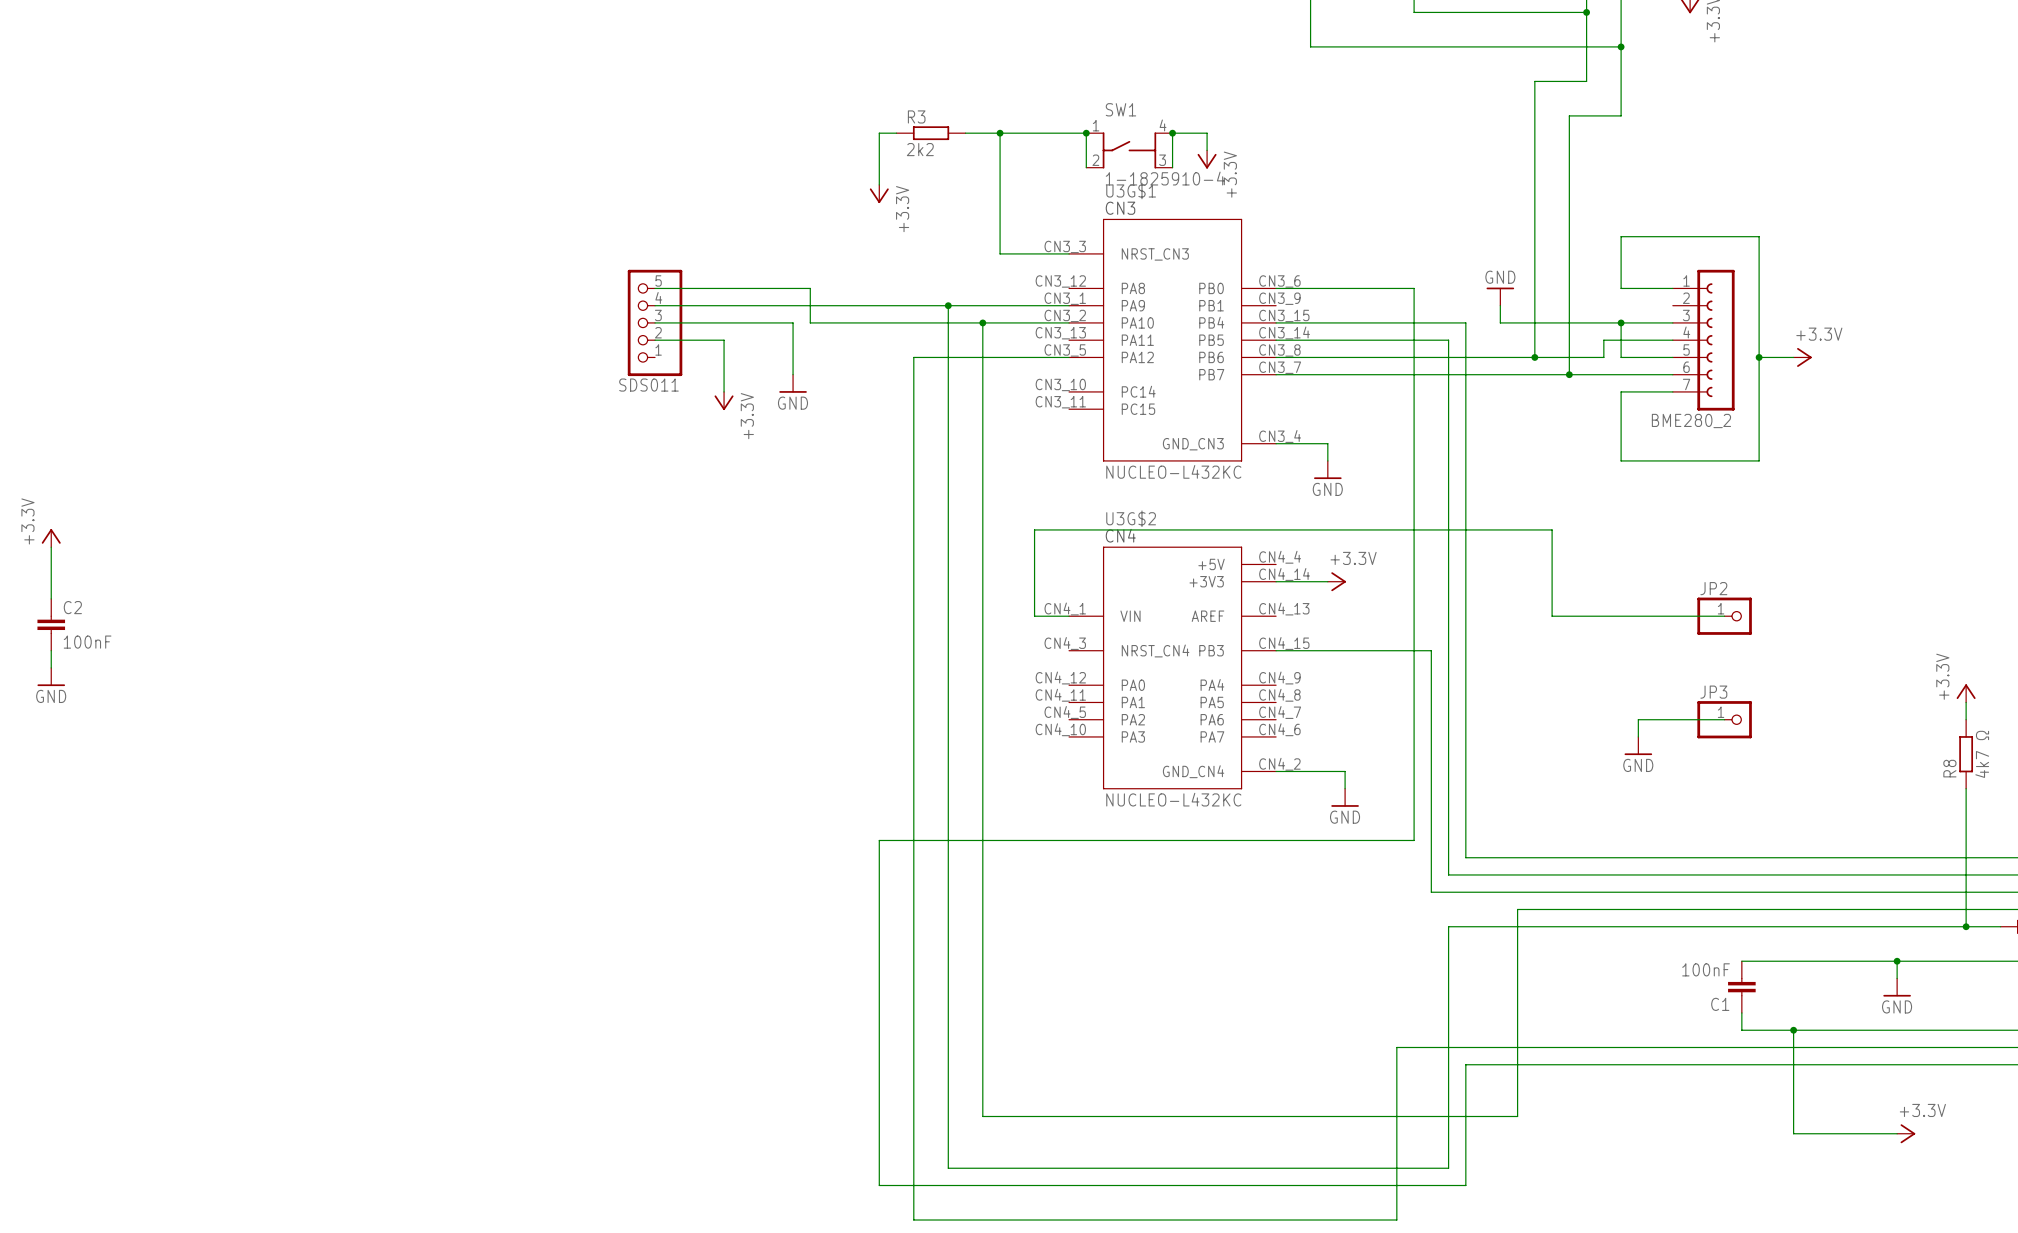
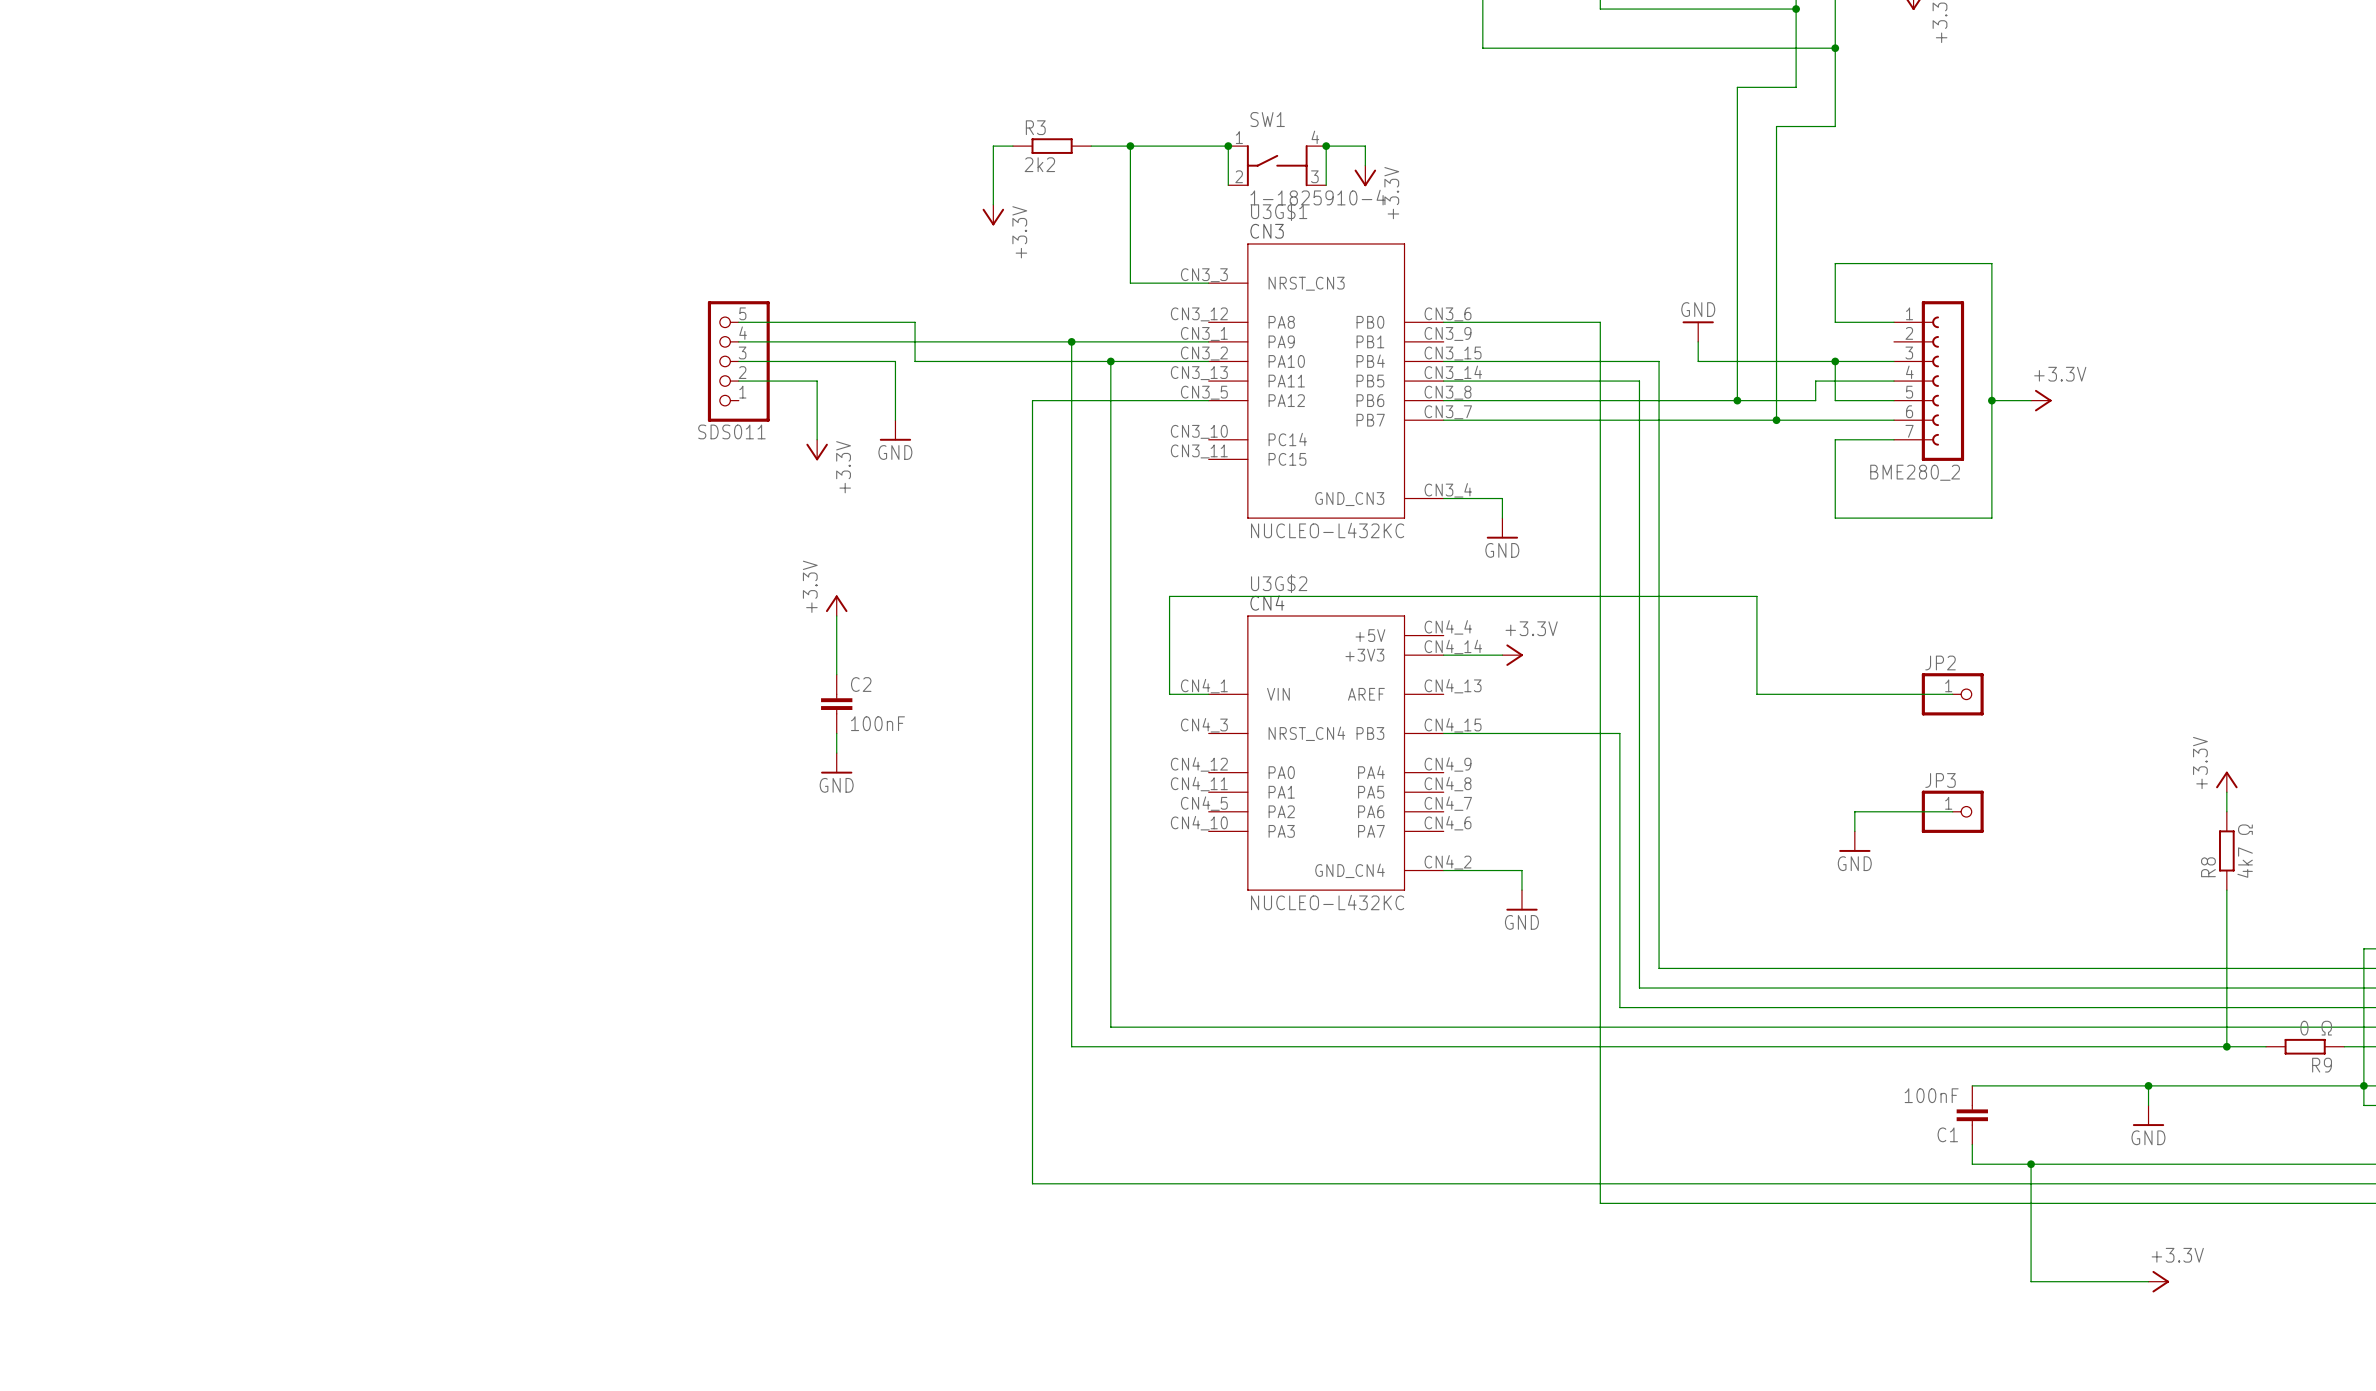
power symbol: +3.3V (51, 538) -> none
power symbol: none -> +3.3V (836, 605)
wire: (51, 547) (51, 598) -> none
wire: none -> (836, 616) (836, 674)
C2 position: (51, 624) -> (836, 704)
wire: (51, 650) (51, 667) -> none
wire: none -> (836, 733) (836, 753)
power symbol: GND (51, 677) -> none
power symbol: none -> GND (836, 763)
wire: (1414, 840) (879, 840) (879, 1185) (1465, 1185) (1465, 1064) -> (1600, 948) (1600, 1203) (1659, 1203)
wire: (982, 909) (982, 1116) (1517, 1116) (1517, 909) -> (1110, 1027) (1717, 1027)
wire: (948, 926) (948, 1168) (1448, 1168) (1448, 926) -> (1071, 1046) (1639, 1046)
wire: (913, 1047) (913, 1220) (1396, 1220) (1396, 1047) -> (1032, 1183) (1580, 1183)

